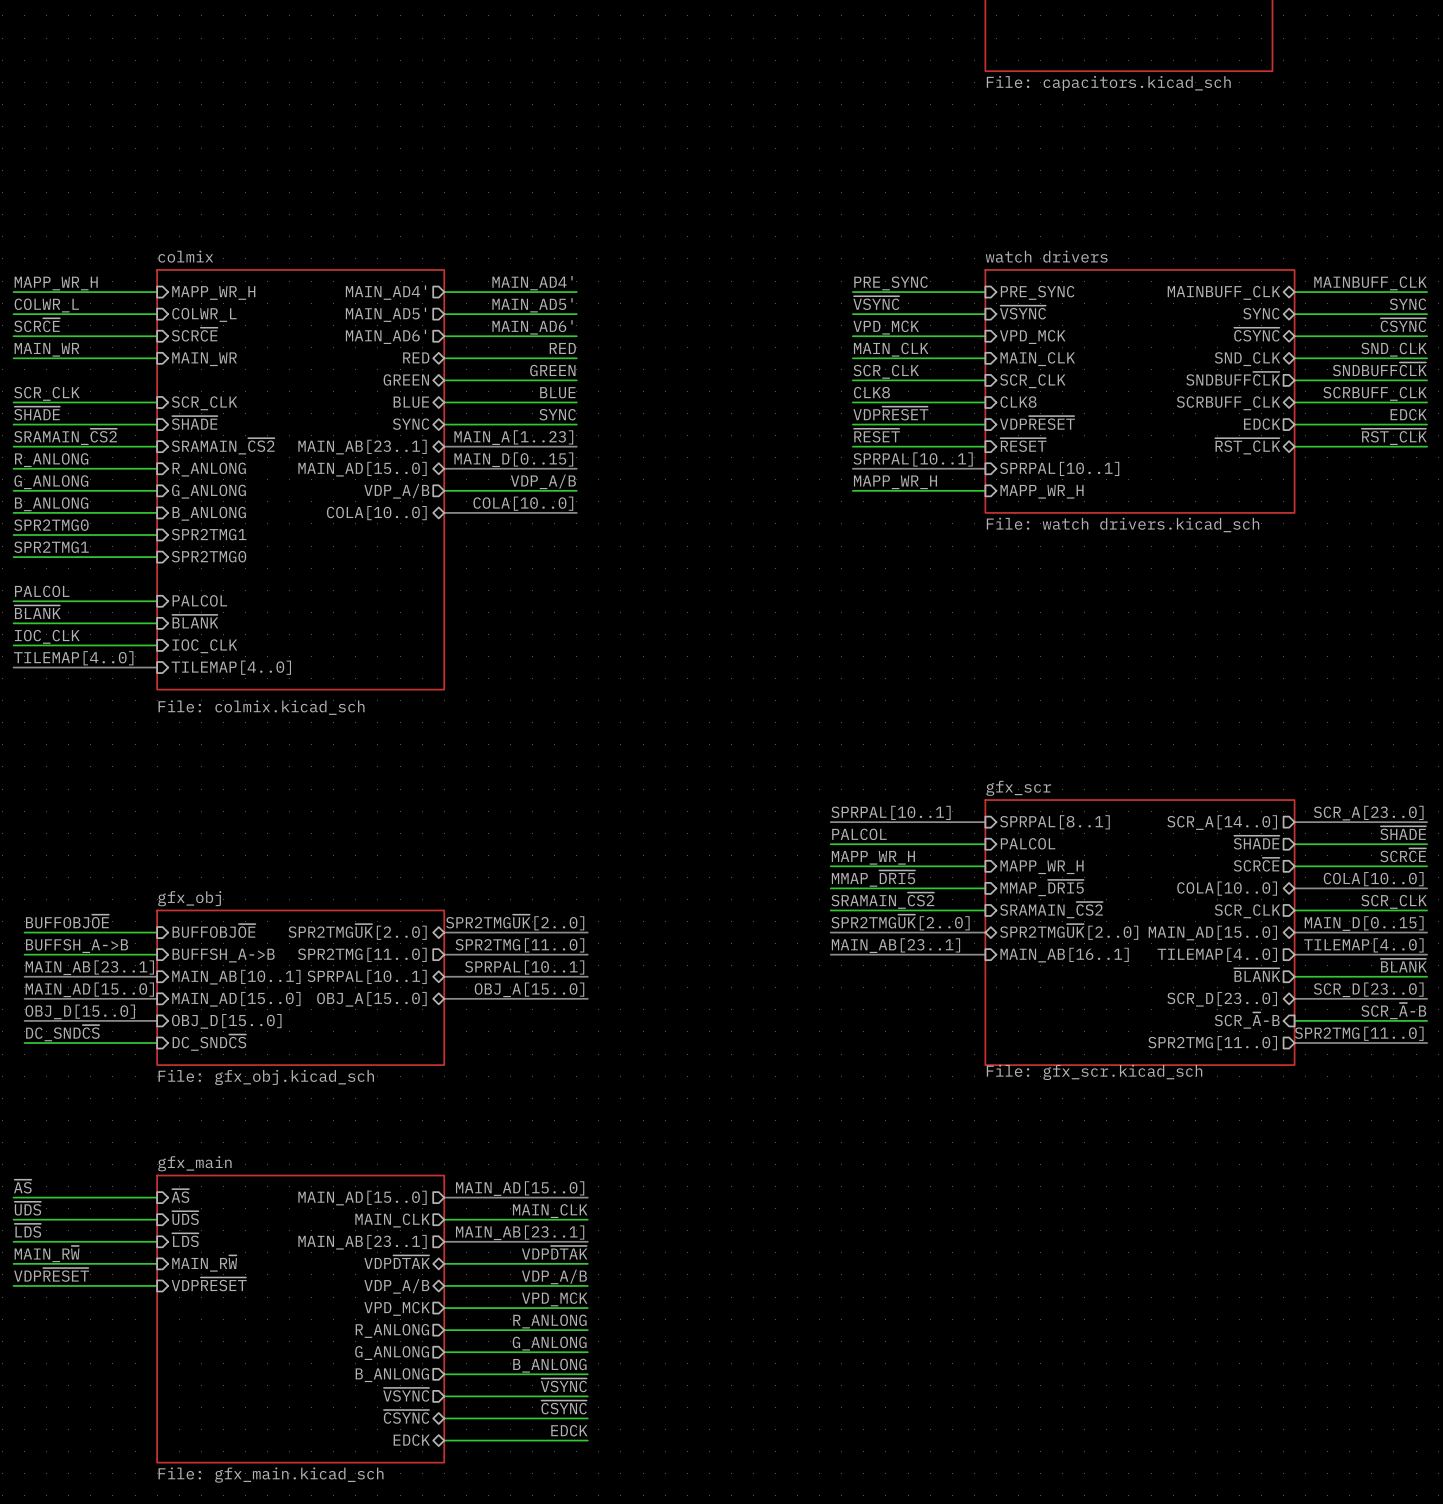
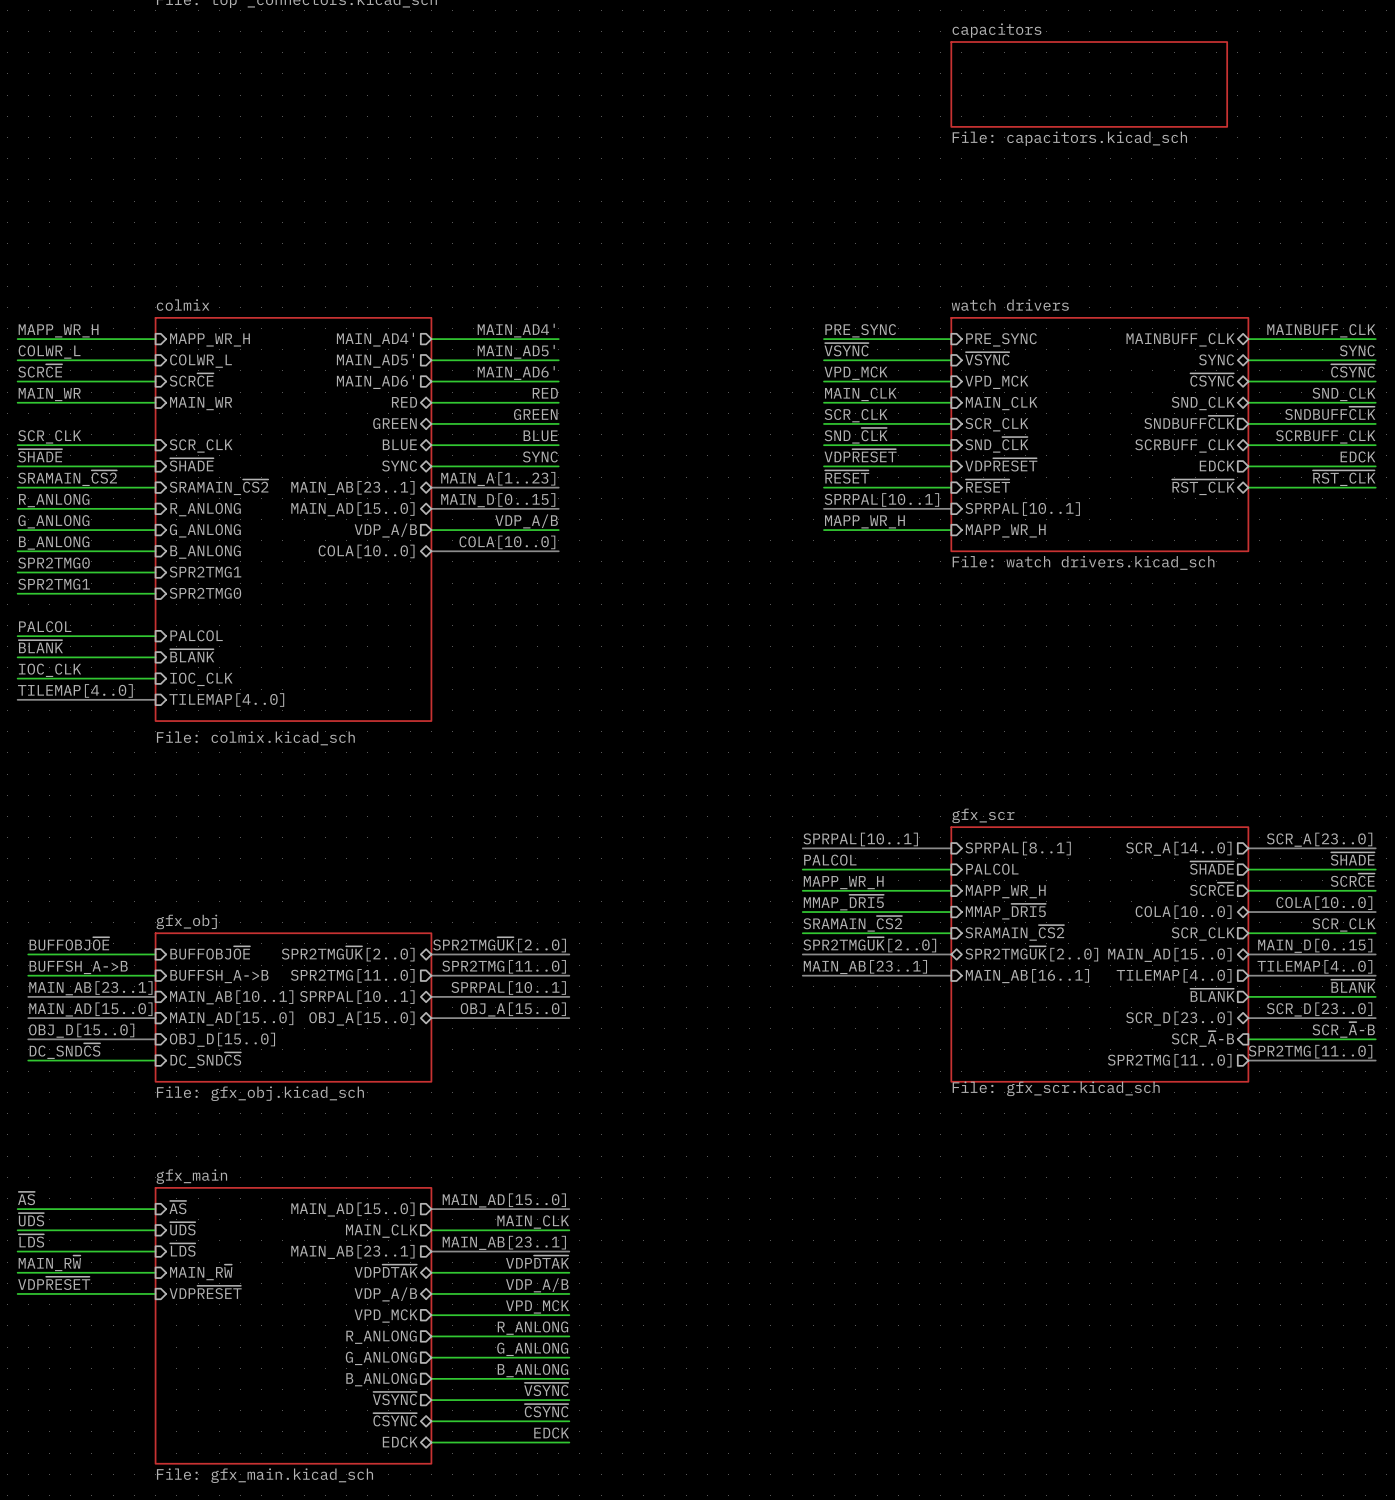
label: CLK8 (871, 392) -> SND_~{CLK} (856, 435)
sheet pin: CLK8 (1018, 402) -> SND_~{CLK} (996, 444)

